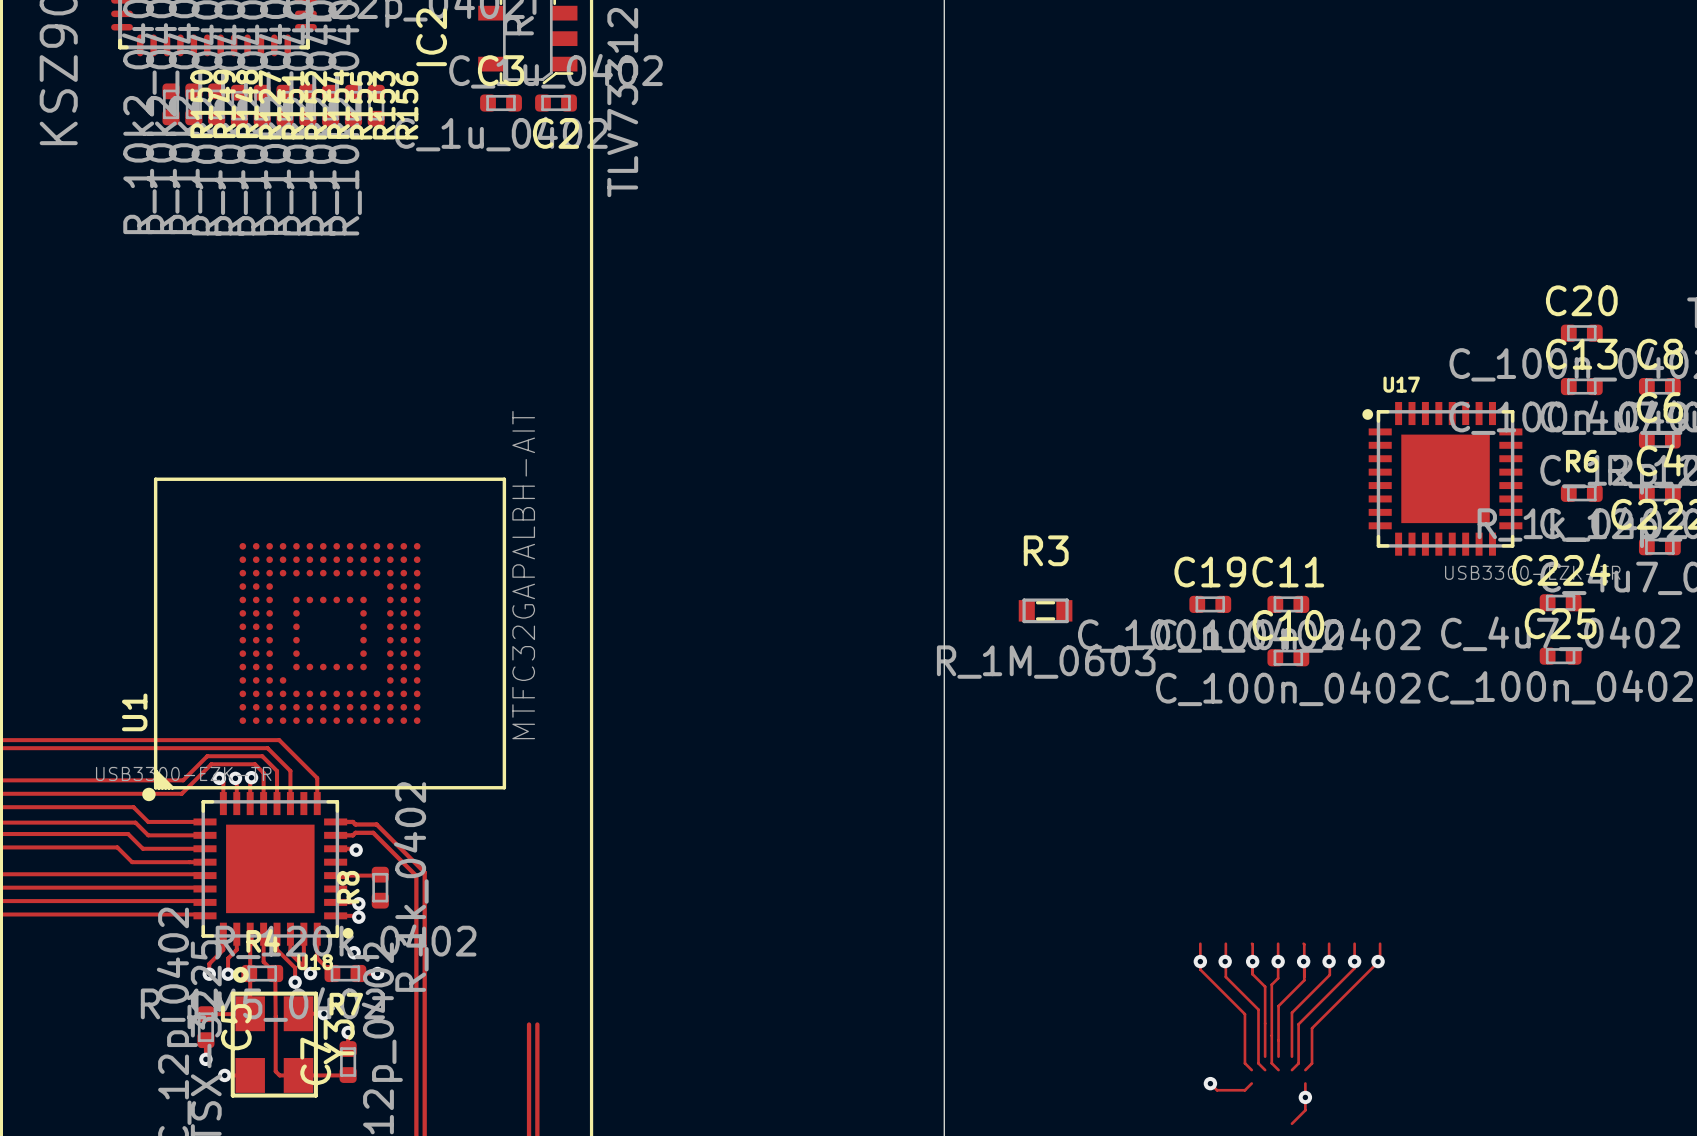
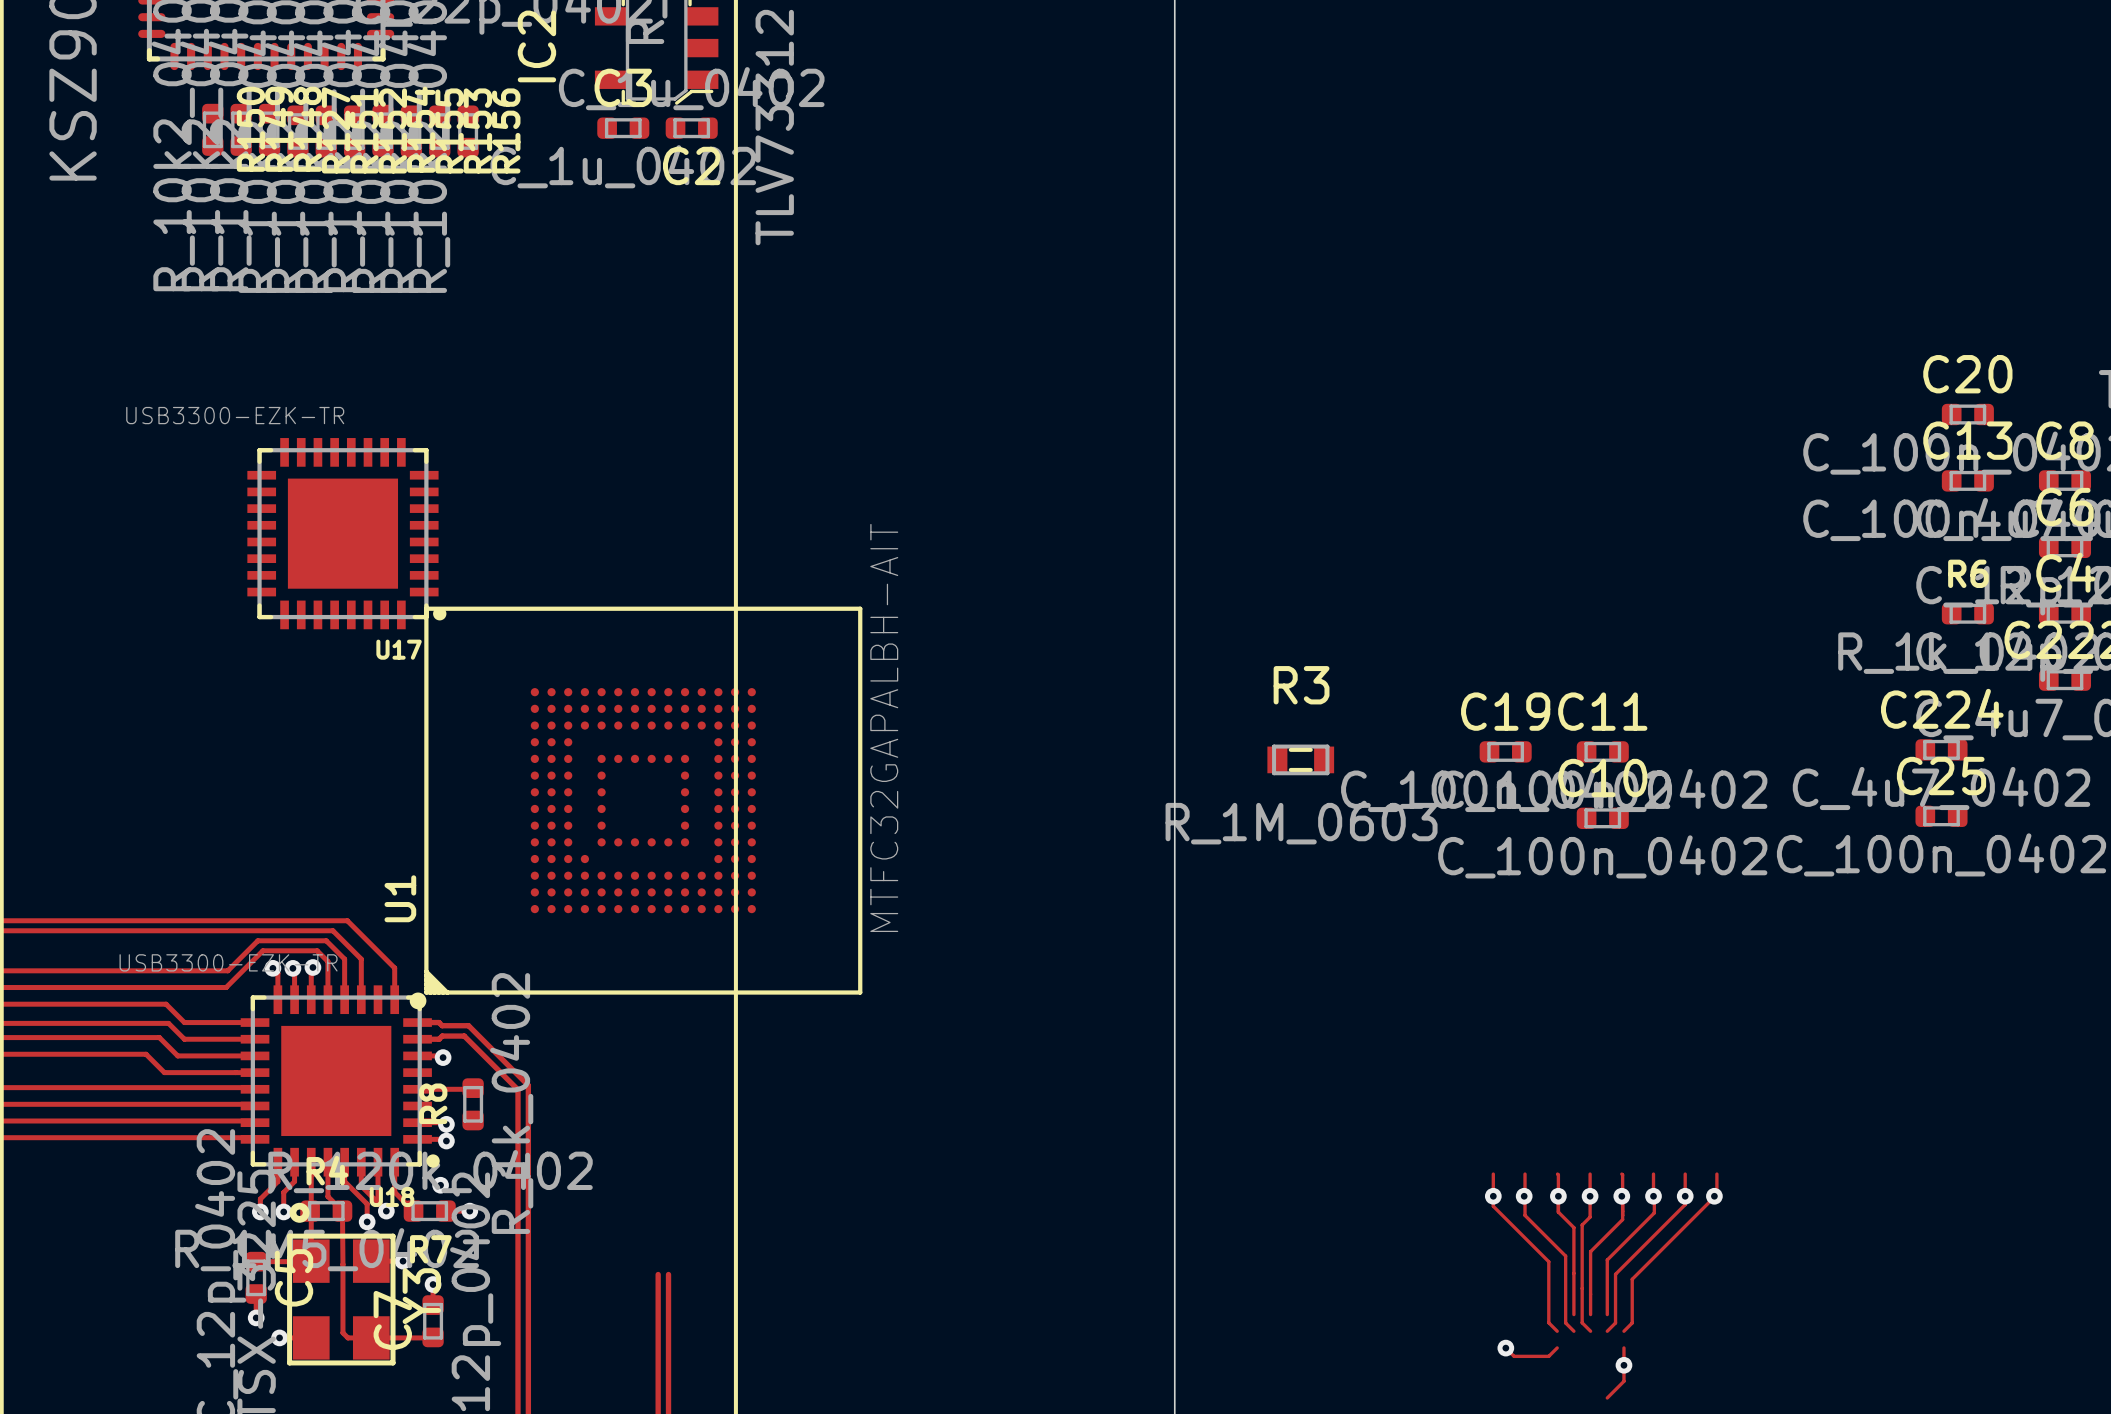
U17 rotation: 0° (1442, 478) -> 180° (346, 533)
U17 position: (1442, 478) -> (346, 533)
U1 position: (324, 639) -> (636, 807)

